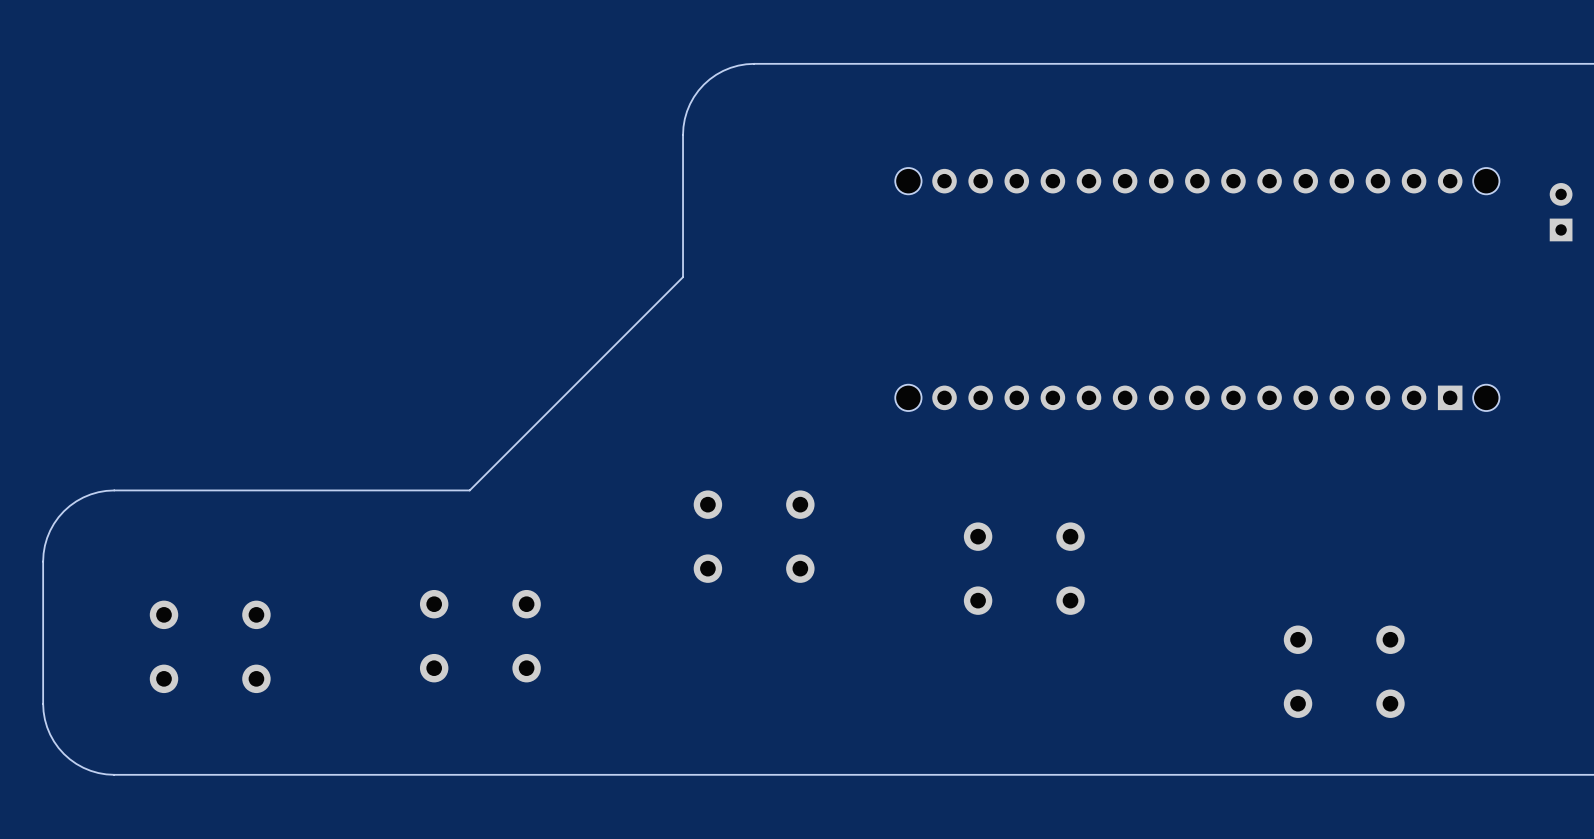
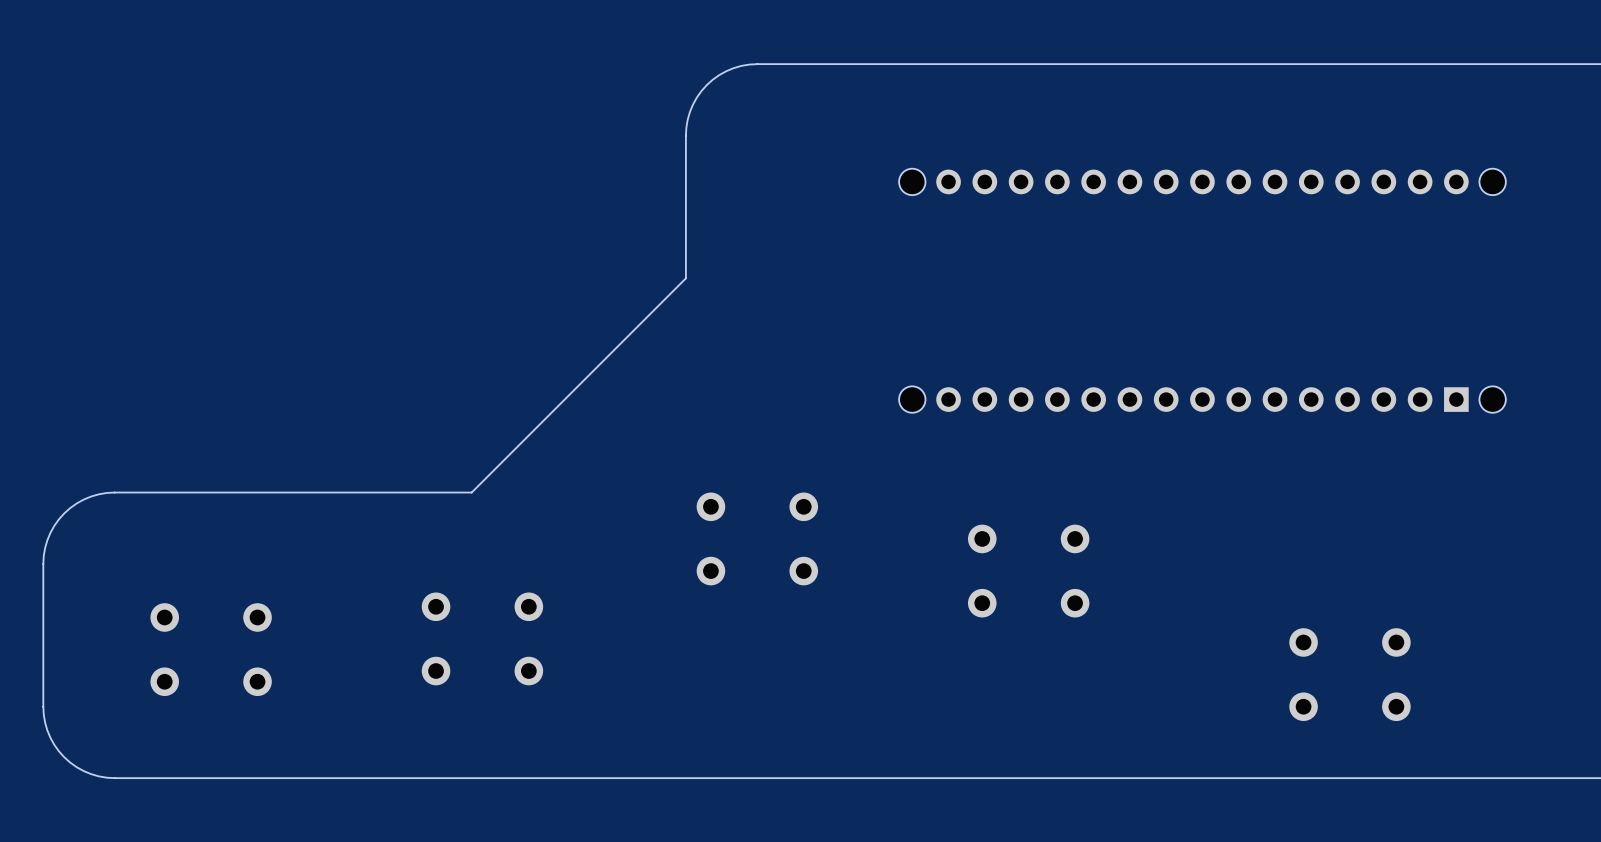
part: (1561, 212) -> none

